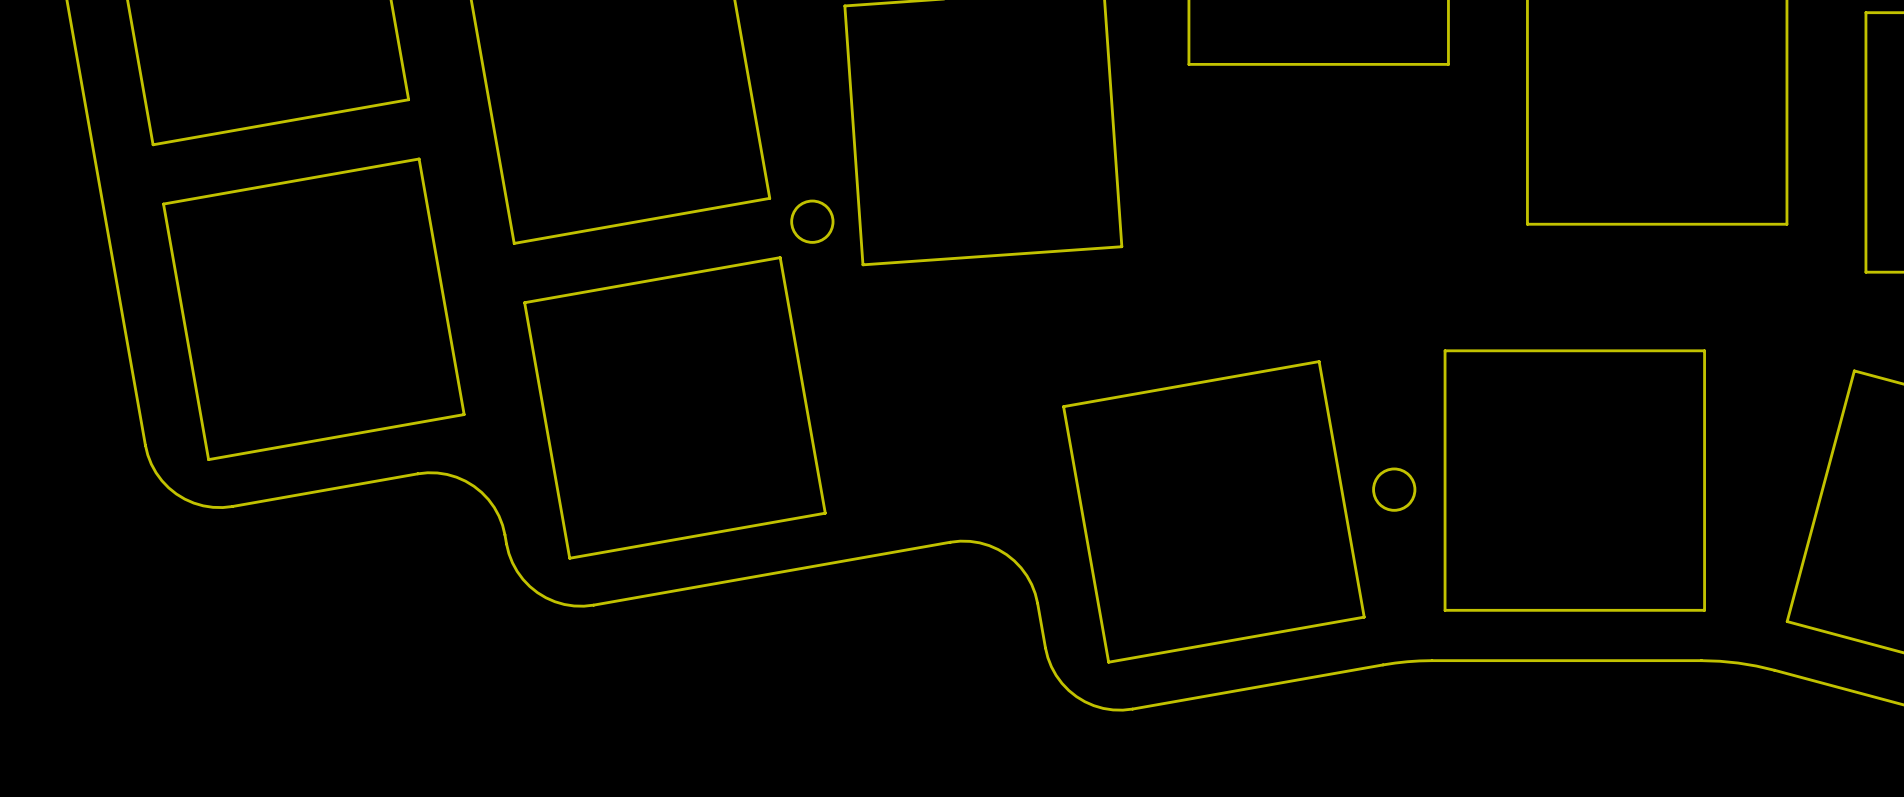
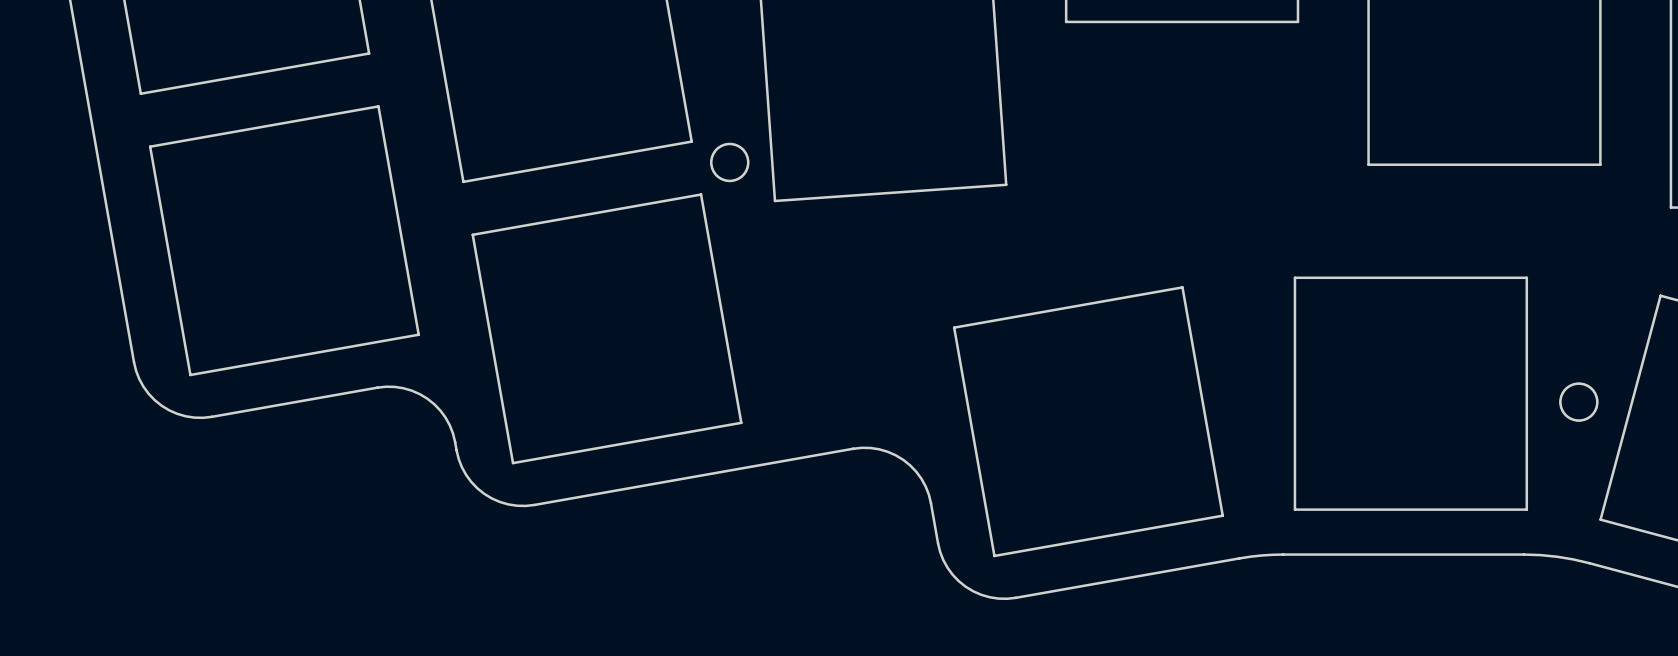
round board edge position: (1394, 489) -> (1578, 402)

